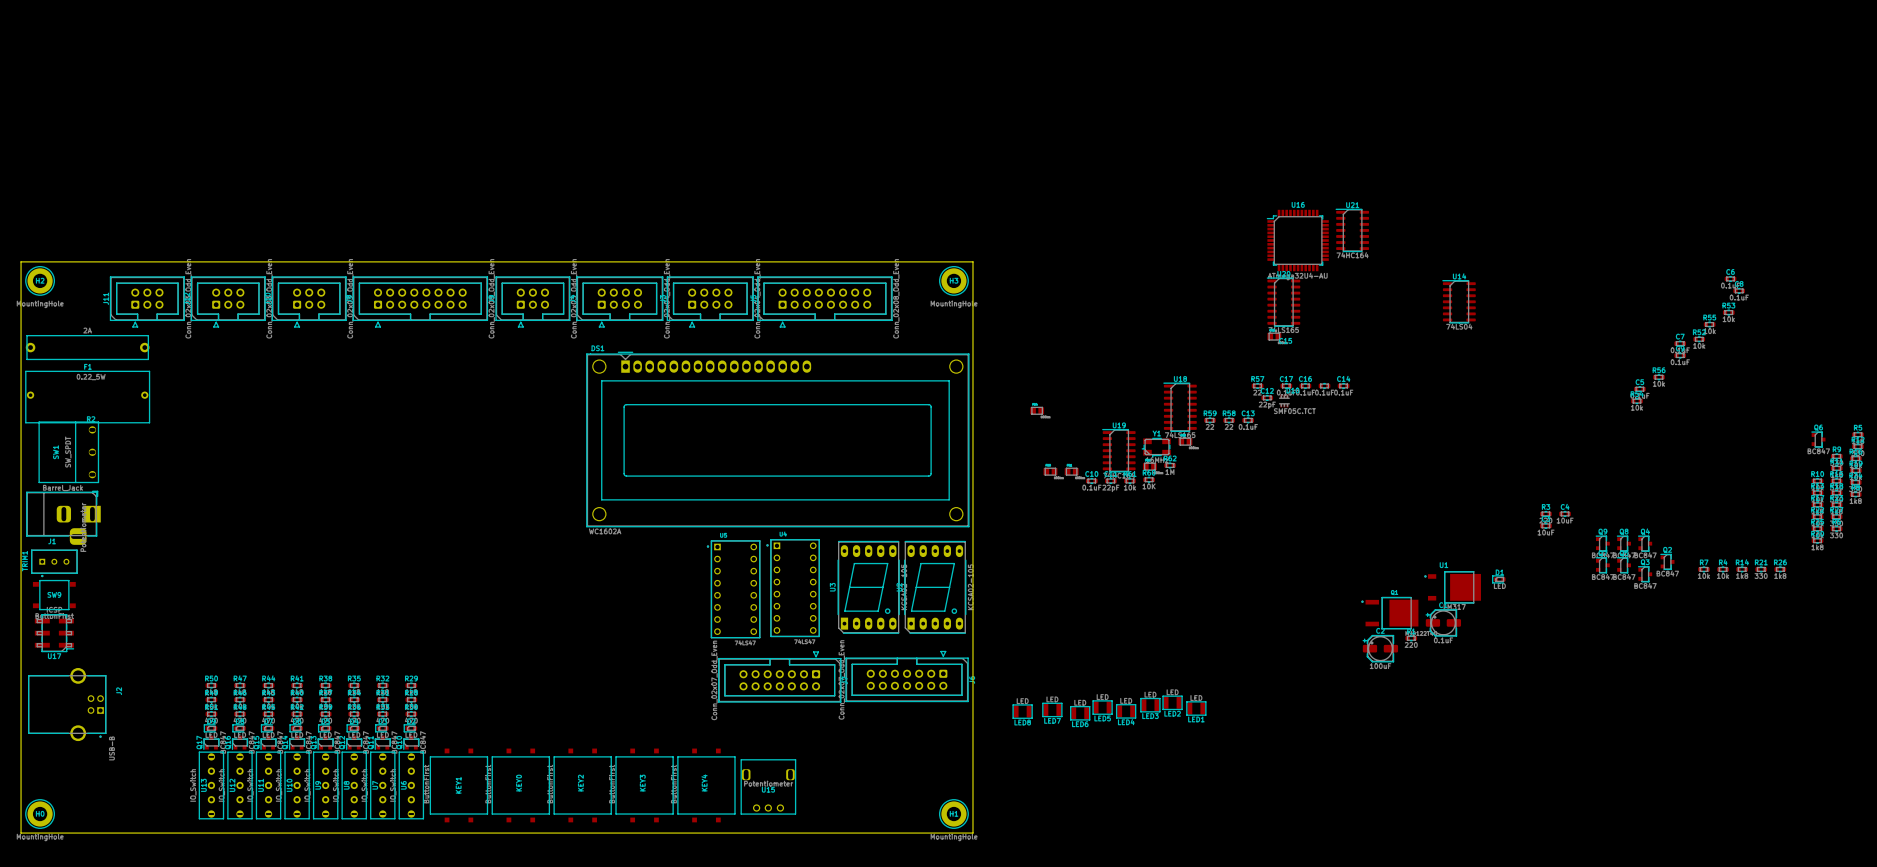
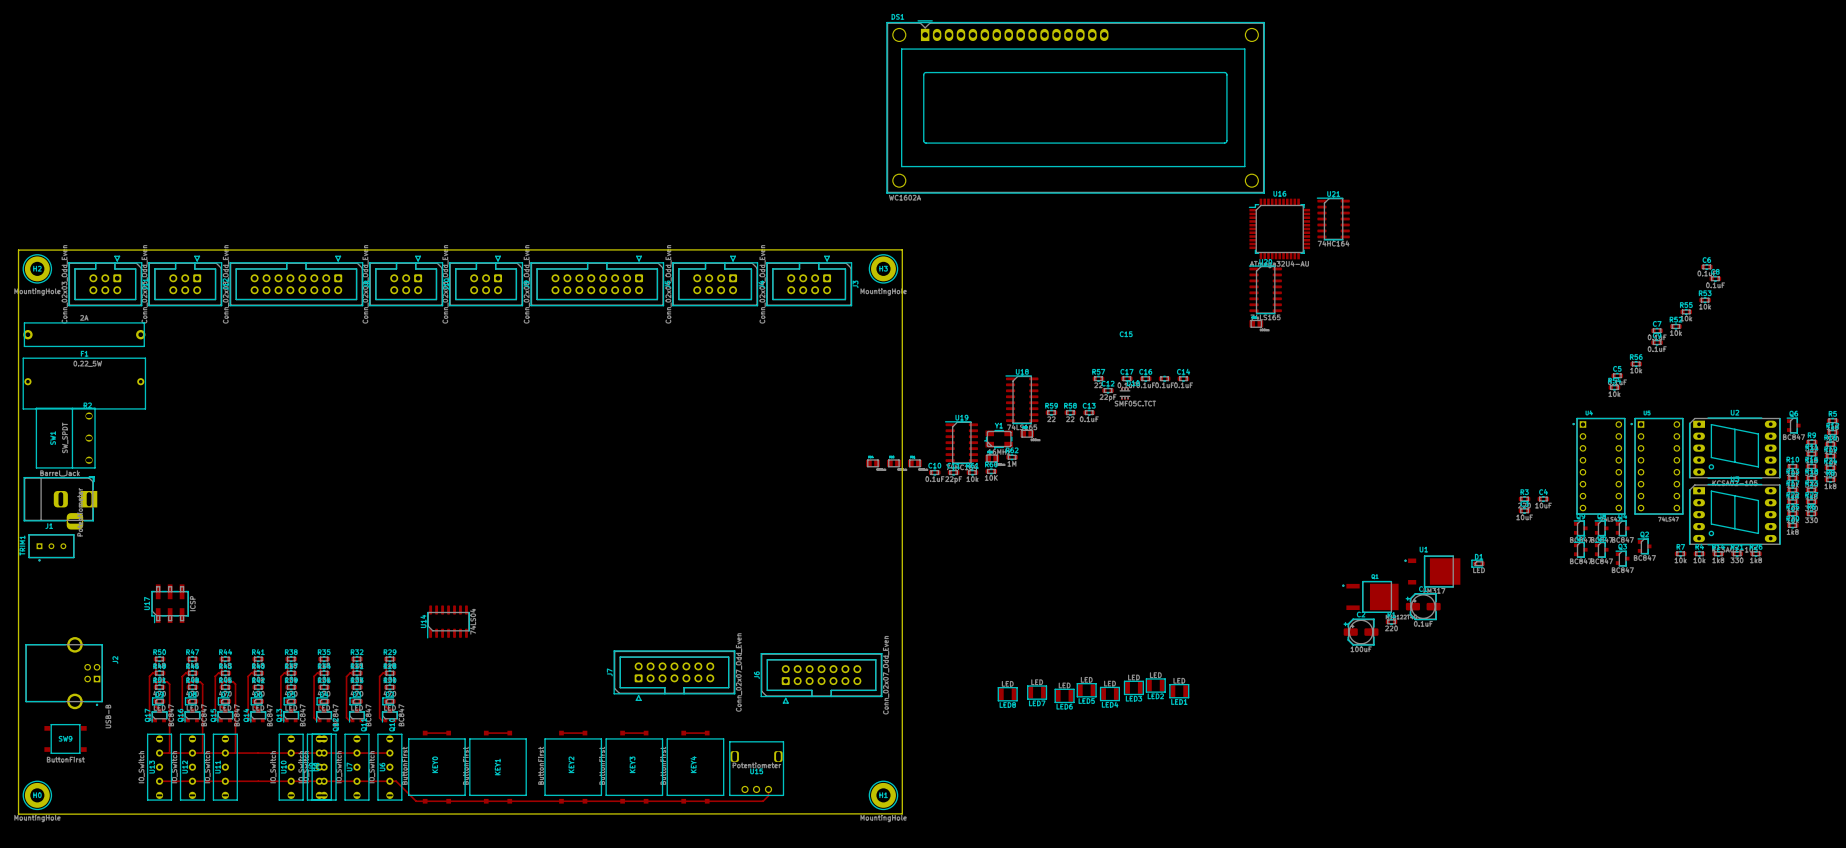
board edge: (21, 261) (972, 261) (972, 833) (21, 833) -> (18, 250) (902, 249) (902, 813) (18, 814)
part position: (953, 280) -> (883, 268)
part rotation: 0° (147, 301) -> 180° (105, 280)
part rotation: 0° (228, 301) -> 180° (185, 280)
part rotation: 0° (309, 301) -> 180° (406, 280)
part position: (309, 301) -> (406, 280)
part rotation: 0° (420, 301) -> 180° (296, 280)
part position: (420, 301) -> (296, 280)
part rotation: 0° (532, 301) -> 180° (486, 280)
part rotation: 0° (619, 301) -> 180° (715, 280)
part position: (619, 301) -> (715, 280)
part rotation: 0° (710, 301) -> 180° (809, 280)
part position: (710, 301) -> (809, 280)
part rotation: 0° (824, 301) -> 180° (597, 280)
part position: (824, 301) -> (597, 280)
part rotation: 0° (1459, 301) -> 90° counterclockwise (448, 621)
part position: (1459, 301) -> (448, 621)
part footprint: [586, 352, 970, 528] -> [886, 20, 1265, 194]
part position: (1257, 385) -> (1098, 378)
part position: (1286, 385) -> (1126, 378)
part position: (1305, 385) -> (1145, 378)
part position: (1324, 385) -> (1164, 378)
part position: (1343, 385) -> (1183, 378)
part position: (1267, 397) -> (1108, 390)
part position: (1284, 401) -> (1124, 393)
part position: (1180, 407) -> (1022, 399)
part position: (1037, 410) -> (872, 463)
part position: (1209, 420) -> (1051, 412)
part position: (1229, 420) -> (1070, 412)
part position: (1248, 420) -> (1089, 412)
part position: (1185, 441) -> (1027, 433)
part position: (1156, 447) -> (998, 439)
part position: (1119, 450) -> (961, 442)
part position: (1170, 465) -> (1012, 457)
part position: (1149, 466) -> (992, 458)
part position: (1050, 471) -> (893, 463)
part position: (1071, 471) -> (914, 463)
part position: (1149, 479) -> (991, 471)
part position: (1091, 480) -> (934, 472)
part position: (1110, 480) -> (953, 472)
part position: (1129, 480) -> (972, 472)
part rotation: 0° (868, 587) -> 90° clockwise (1734, 514)
part position: (868, 587) -> (1734, 514)
part rotation: 0° (935, 587) -> 90° clockwise (1734, 448)
part position: (935, 587) -> (1734, 448)
part position: (793, 588) -> (1598, 466)
part position: (733, 589) -> (1656, 466)
part position: (54, 595) -> (65, 738)
part rotation: 0° (54, 633) -> 90° clockwise (170, 603)
part position: (54, 633) -> (170, 603)
track: none -> (155, 659) (155, 673) (149, 676) (149, 718) (155, 720)
track: none -> (188, 659) (188, 673) (182, 676) (182, 718) (188, 720)
track: none -> (221, 659) (221, 673) (215, 676)
track: none -> (254, 659) (254, 673) (248, 676) (248, 717) (253, 720)
track: none -> (287, 659) (287, 673) (280, 676) (280, 717) (286, 720)
track: none -> (320, 659) (320, 673) (314, 676) (314, 717) (319, 720)
track: none -> (353, 659) (353, 673) (346, 676) (346, 717) (352, 720)
track: none -> (386, 659) (386, 673) (379, 676) (379, 718) (385, 720)
part rotation: 0° (779, 676) -> 180° (674, 675)
part position: (779, 676) -> (674, 675)
part rotation: 0° (907, 676) -> 180° (821, 678)
part position: (907, 676) -> (821, 678)
part position: (211, 685) -> (159, 659)
part position: (239, 685) -> (192, 659)
part position: (268, 685) -> (225, 659)
part position: (297, 685) -> (258, 659)
part position: (325, 685) -> (291, 659)
part position: (354, 685) -> (324, 659)
part position: (382, 685) -> (356, 659)
part position: (411, 685) -> (389, 659)
track: none -> (215, 676) (215, 718) (220, 720)
part position: (211, 699) -> (159, 673)
part position: (239, 699) -> (192, 673)
part position: (268, 699) -> (225, 673)
part position: (297, 699) -> (258, 673)
part position: (325, 699) -> (291, 673)
part position: (354, 699) -> (324, 673)
part position: (382, 699) -> (356, 673)
part position: (411, 699) -> (389, 673)
part position: (67, 704) -> (64, 673)
track: none -> (155, 687) (157, 681) (167, 681) (169, 684) (169, 753)
track: none -> (188, 687) (190, 682) (200, 682) (202, 684) (202, 752)
track: none -> (221, 687) (223, 681) (233, 681) (235, 684) (234, 753)
part position: (211, 714) -> (159, 687)
part position: (239, 714) -> (192, 687)
part position: (268, 714) -> (225, 687)
part position: (297, 714) -> (258, 687)
part position: (325, 714) -> (291, 687)
part position: (354, 714) -> (324, 687)
part position: (382, 714) -> (356, 687)
part position: (411, 714) -> (389, 687)
track: none -> (155, 701) (155, 707) (159, 710)
track: none -> (221, 701) (221, 707) (225, 710)
track: none -> (254, 701) (254, 707) (258, 710)
track: none -> (320, 701) (320, 707) (324, 710)
track: none -> (386, 701) (386, 707) (389, 710)
part position: (210, 728) -> (158, 701)
part position: (239, 728) -> (191, 701)
part position: (267, 728) -> (224, 701)
part position: (296, 728) -> (257, 701)
part position: (324, 728) -> (290, 701)
part position: (353, 728) -> (323, 701)
part position: (382, 728) -> (356, 701)
part position: (410, 728) -> (389, 701)
part position: (211, 742) -> (159, 715)
part position: (239, 742) -> (192, 715)
part position: (268, 742) -> (225, 715)
part position: (297, 742) -> (258, 715)
part position: (325, 742) -> (291, 715)
part position: (354, 742) -> (324, 715)
part position: (382, 742) -> (356, 715)
part position: (411, 742) -> (389, 715)
track: none -> (425, 733) (448, 733)
track: none -> (486, 733) (509, 733)
track: none -> (561, 733) (584, 733)
track: none -> (622, 733) (646, 733)
track: none -> (683, 733) (707, 733)
track: none -> (159, 753) (389, 753)
part position: (211, 785) -> (159, 767)
part position: (239, 785) -> (192, 767)
part position: (268, 785) -> (225, 767)
part position: (354, 785) -> (324, 767)
part position: (382, 785) -> (356, 767)
part position: (411, 785) -> (389, 767)
part position: (458, 785) -> (498, 767)
part position: (520, 785) -> (436, 767)
track: none -> (159, 781) (396, 781) (416, 801) (763, 801) (768, 795) (768, 789)
part position: (953, 814) -> (883, 795)

